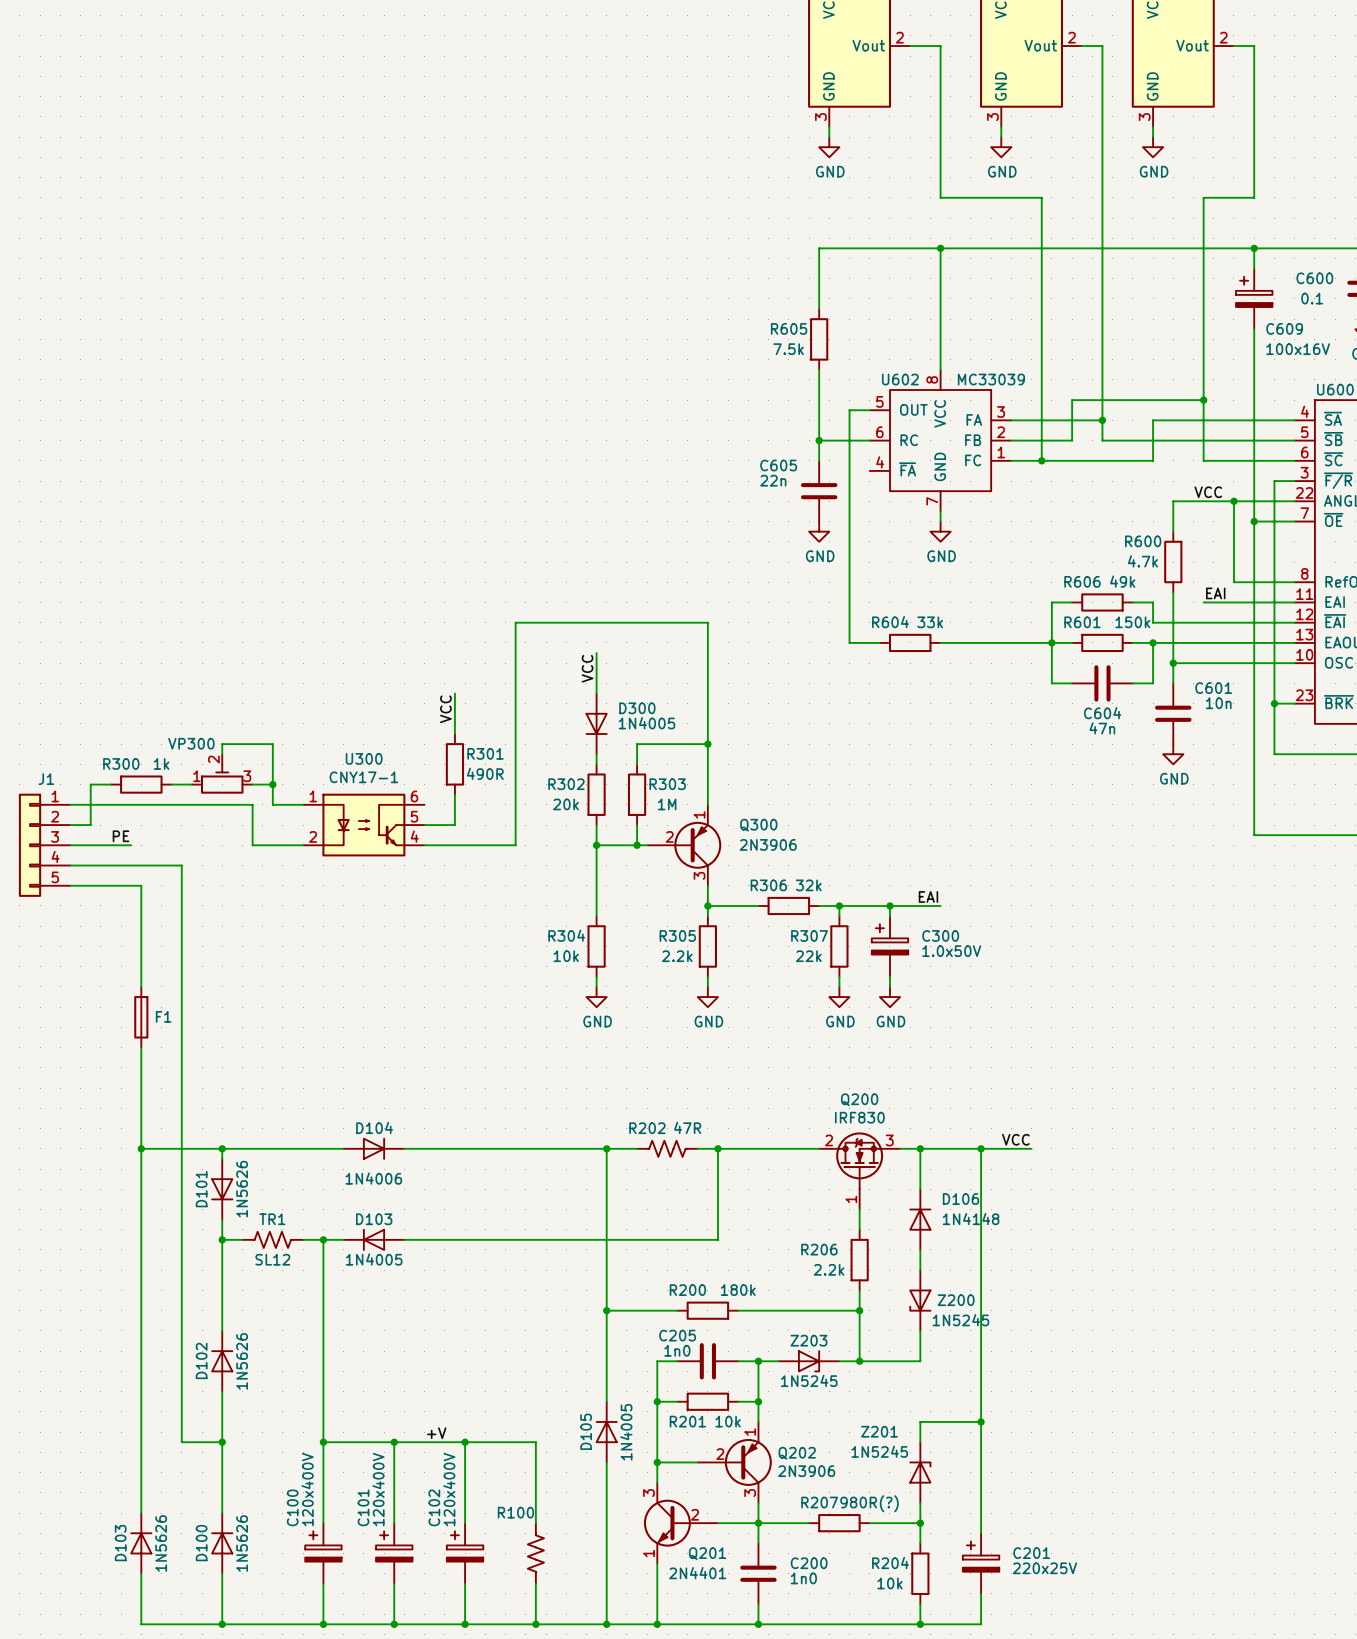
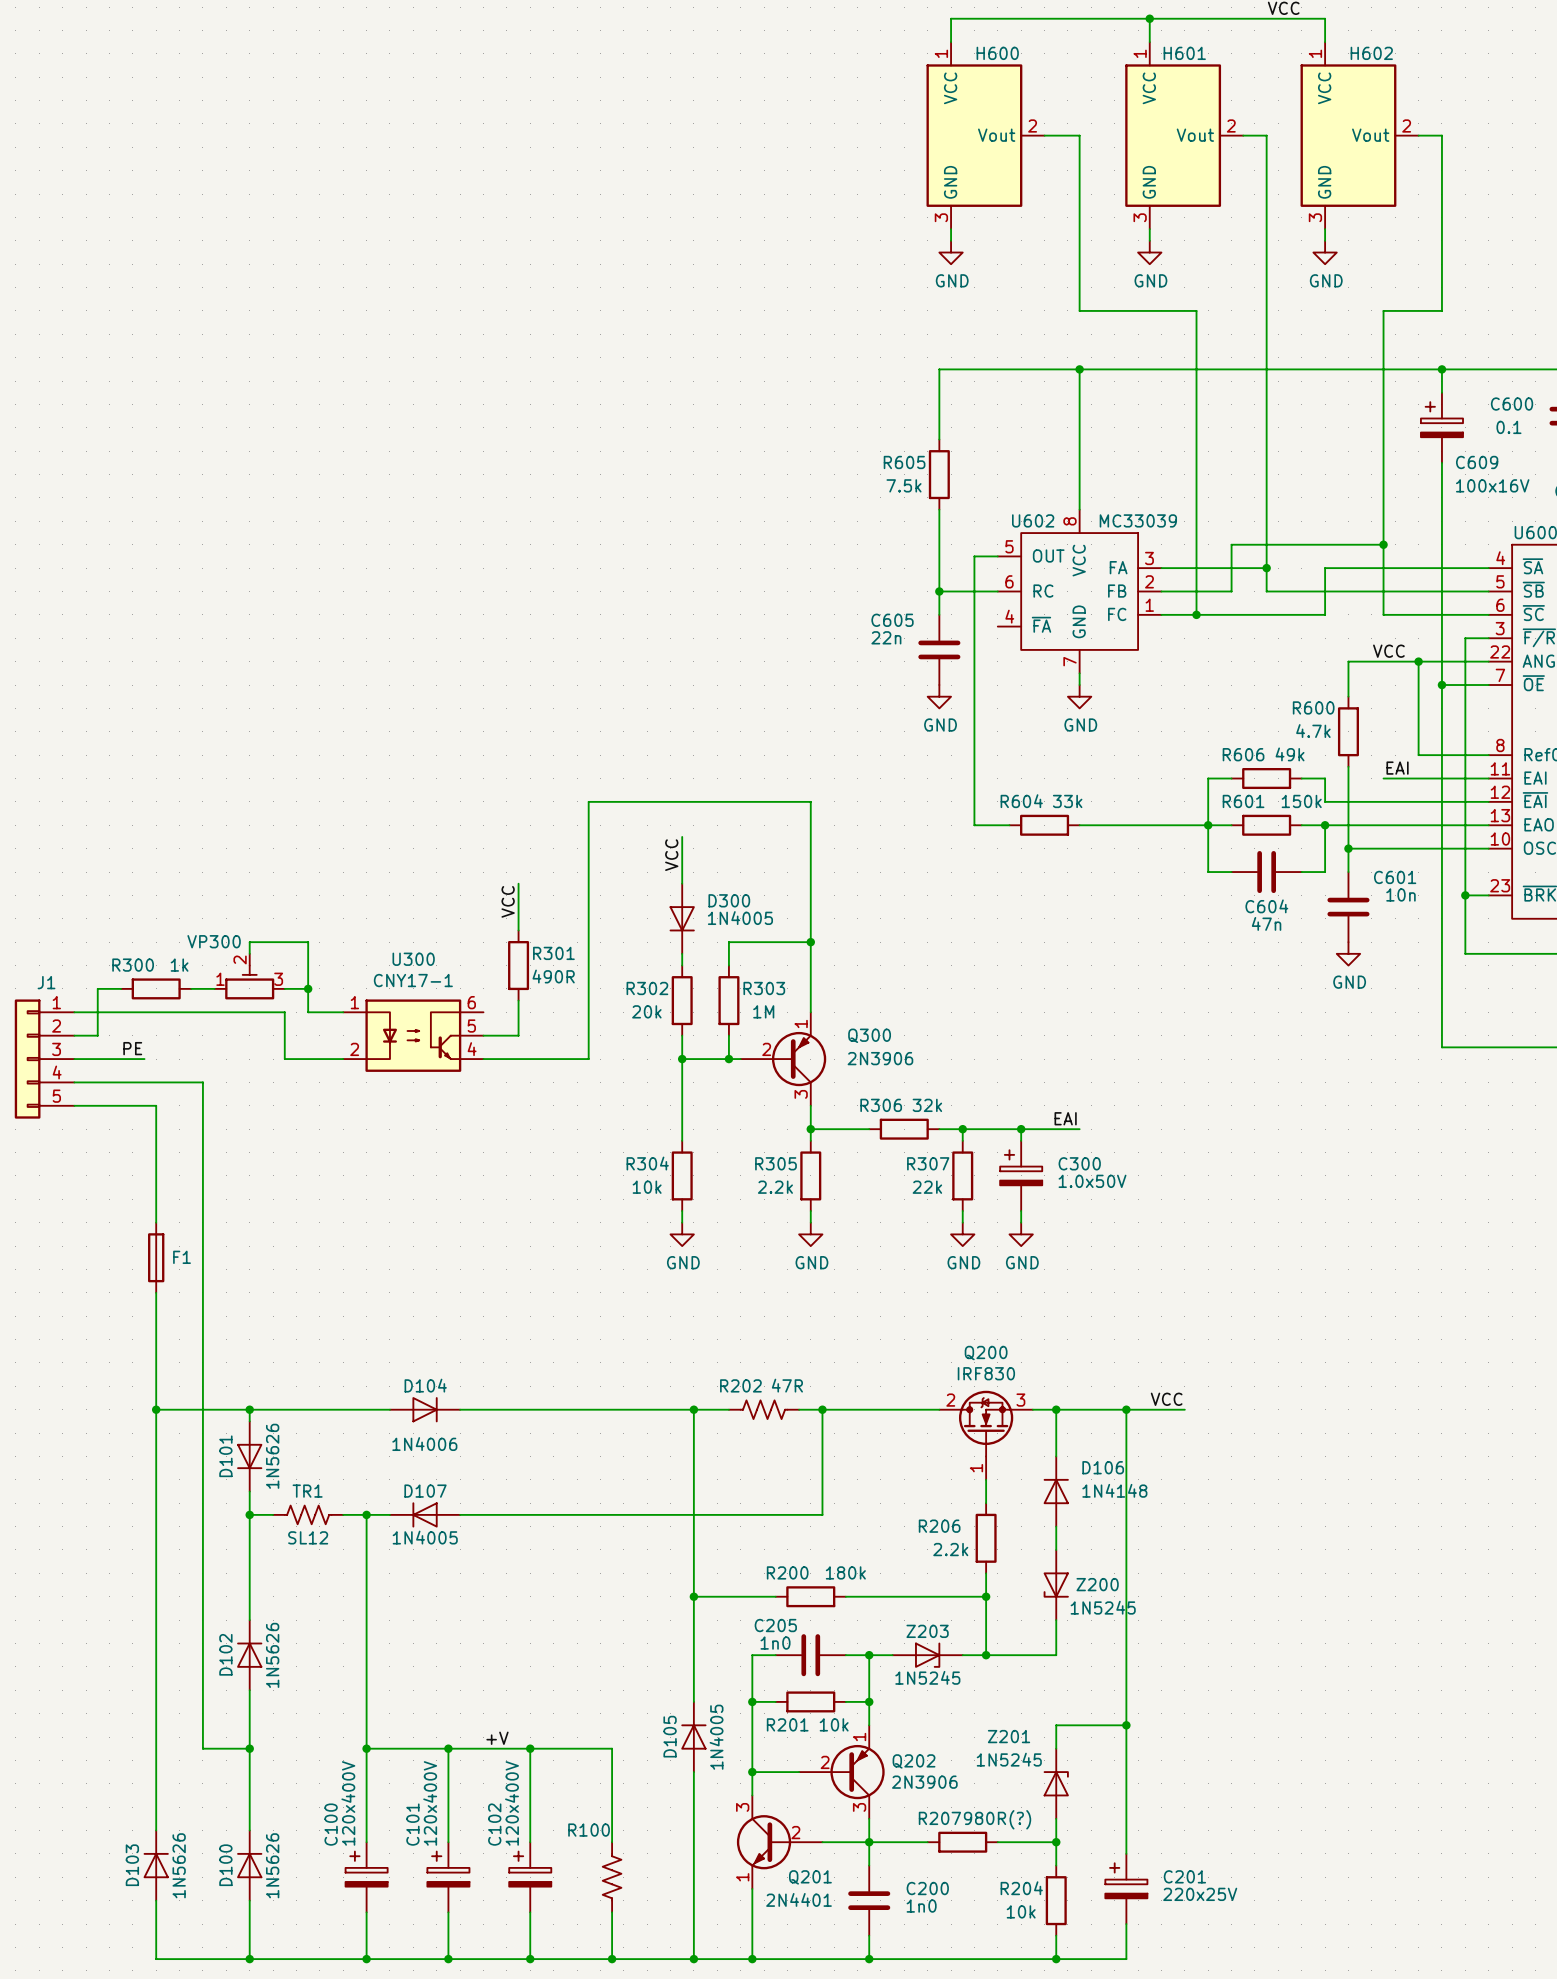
D103 name: D103 (374, 1219) -> D107 (425, 1491)

